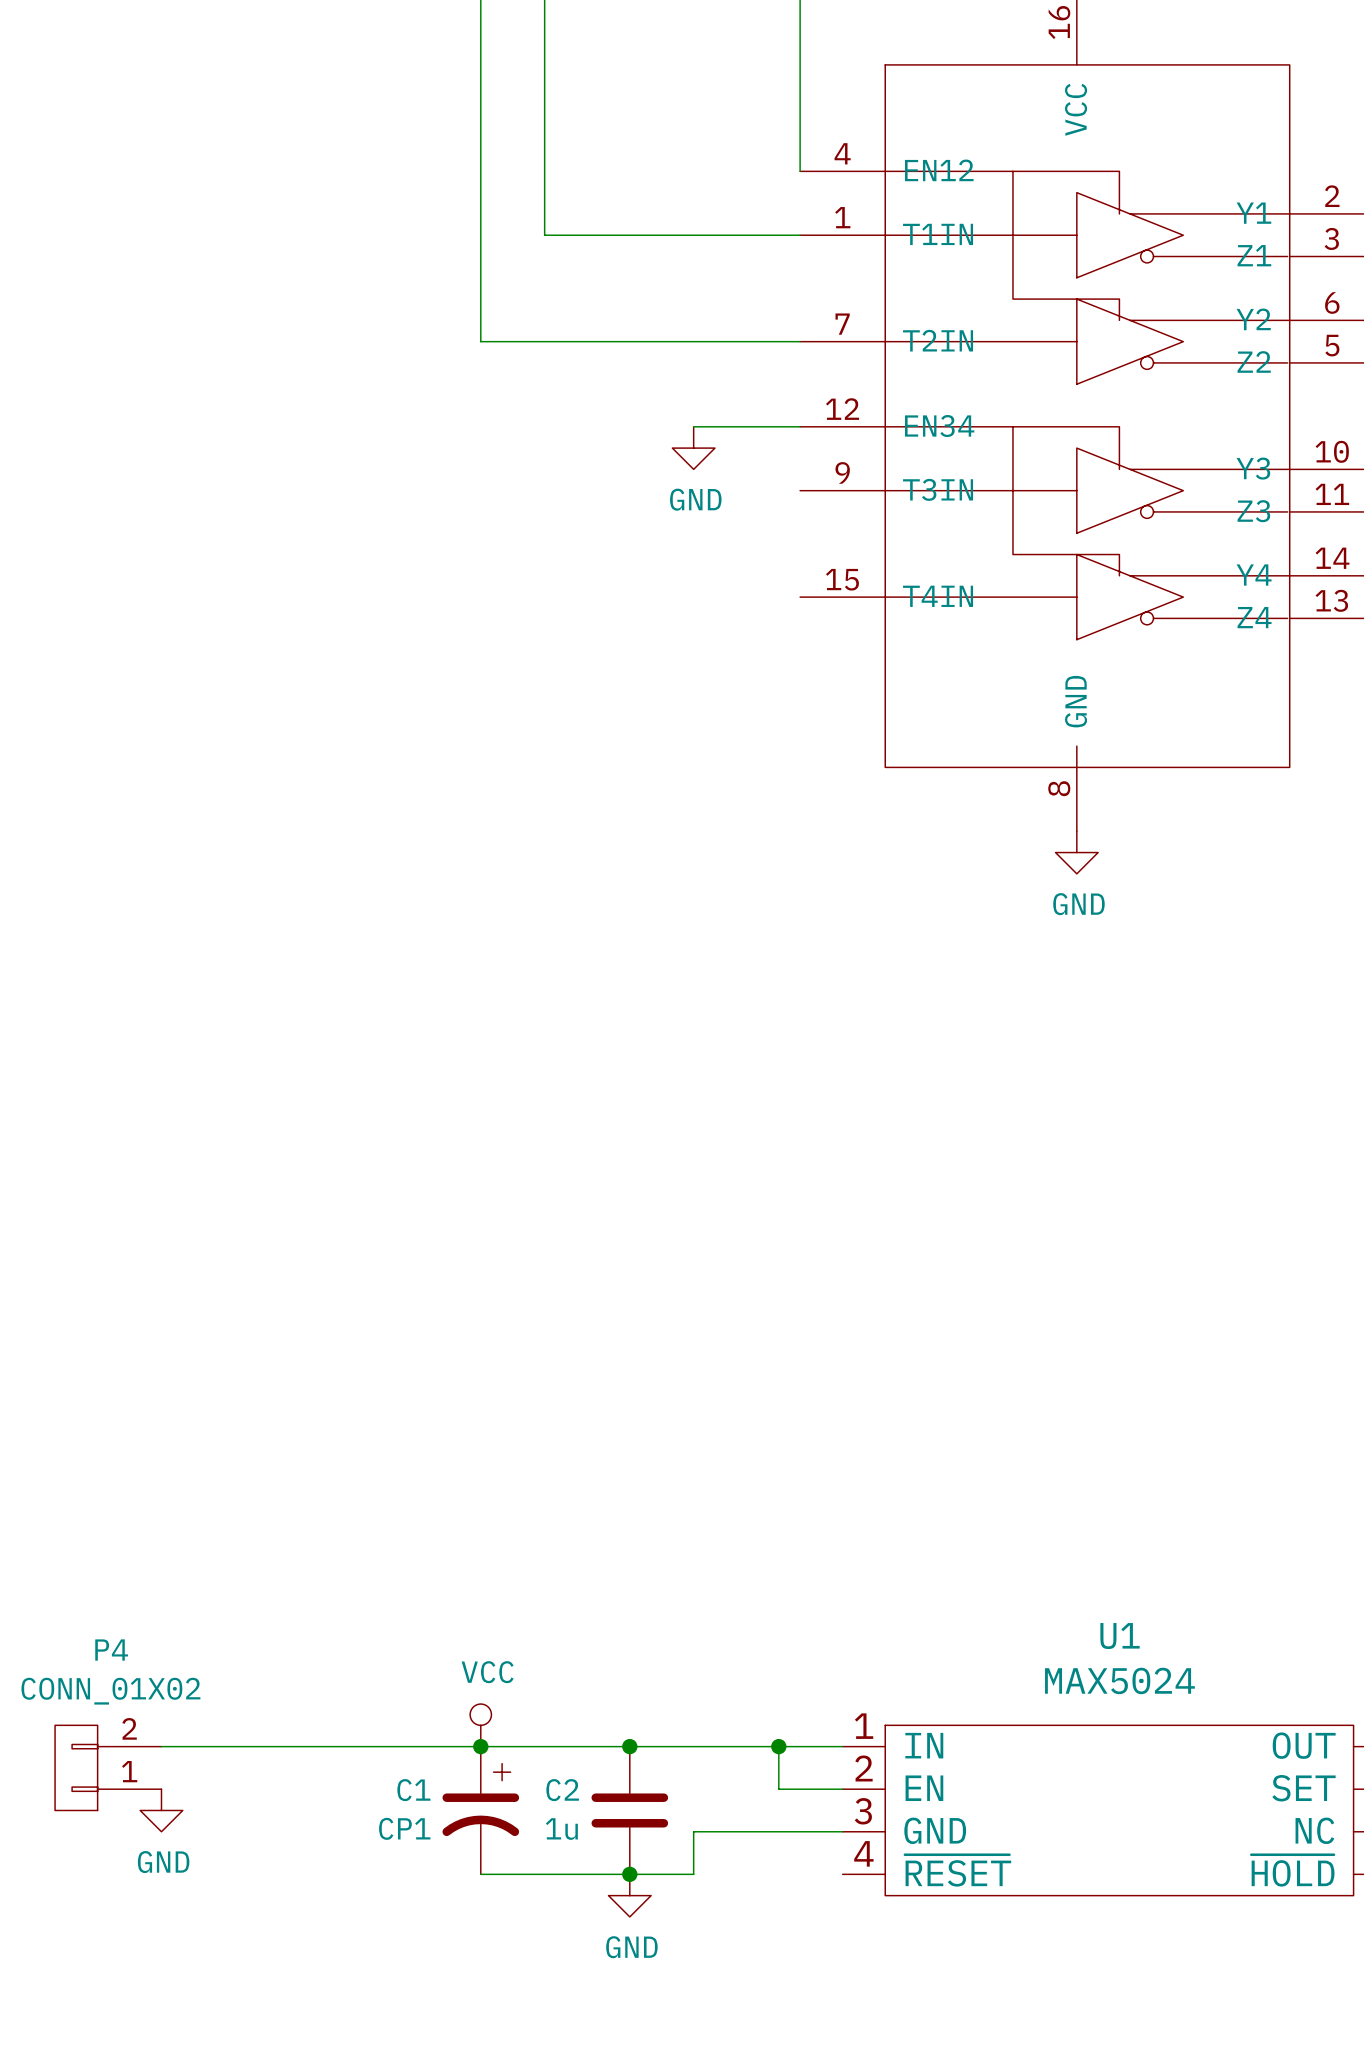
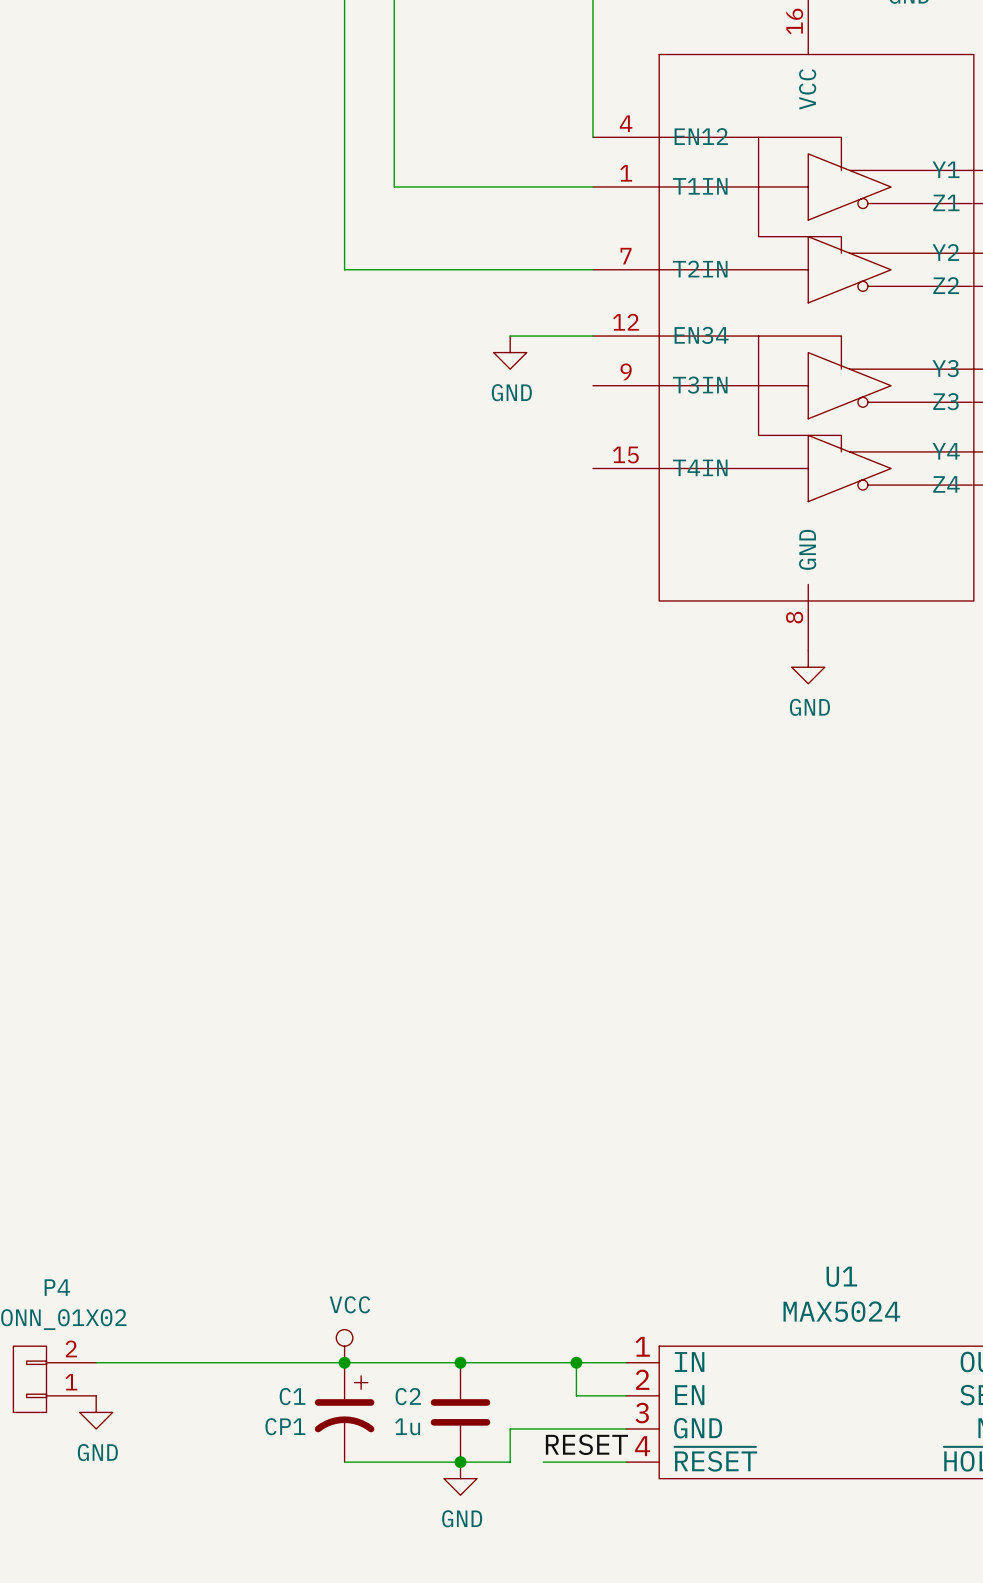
label: none -> RESET (586, 1444)
wire: none -> (543, 1462) (626, 1462)

